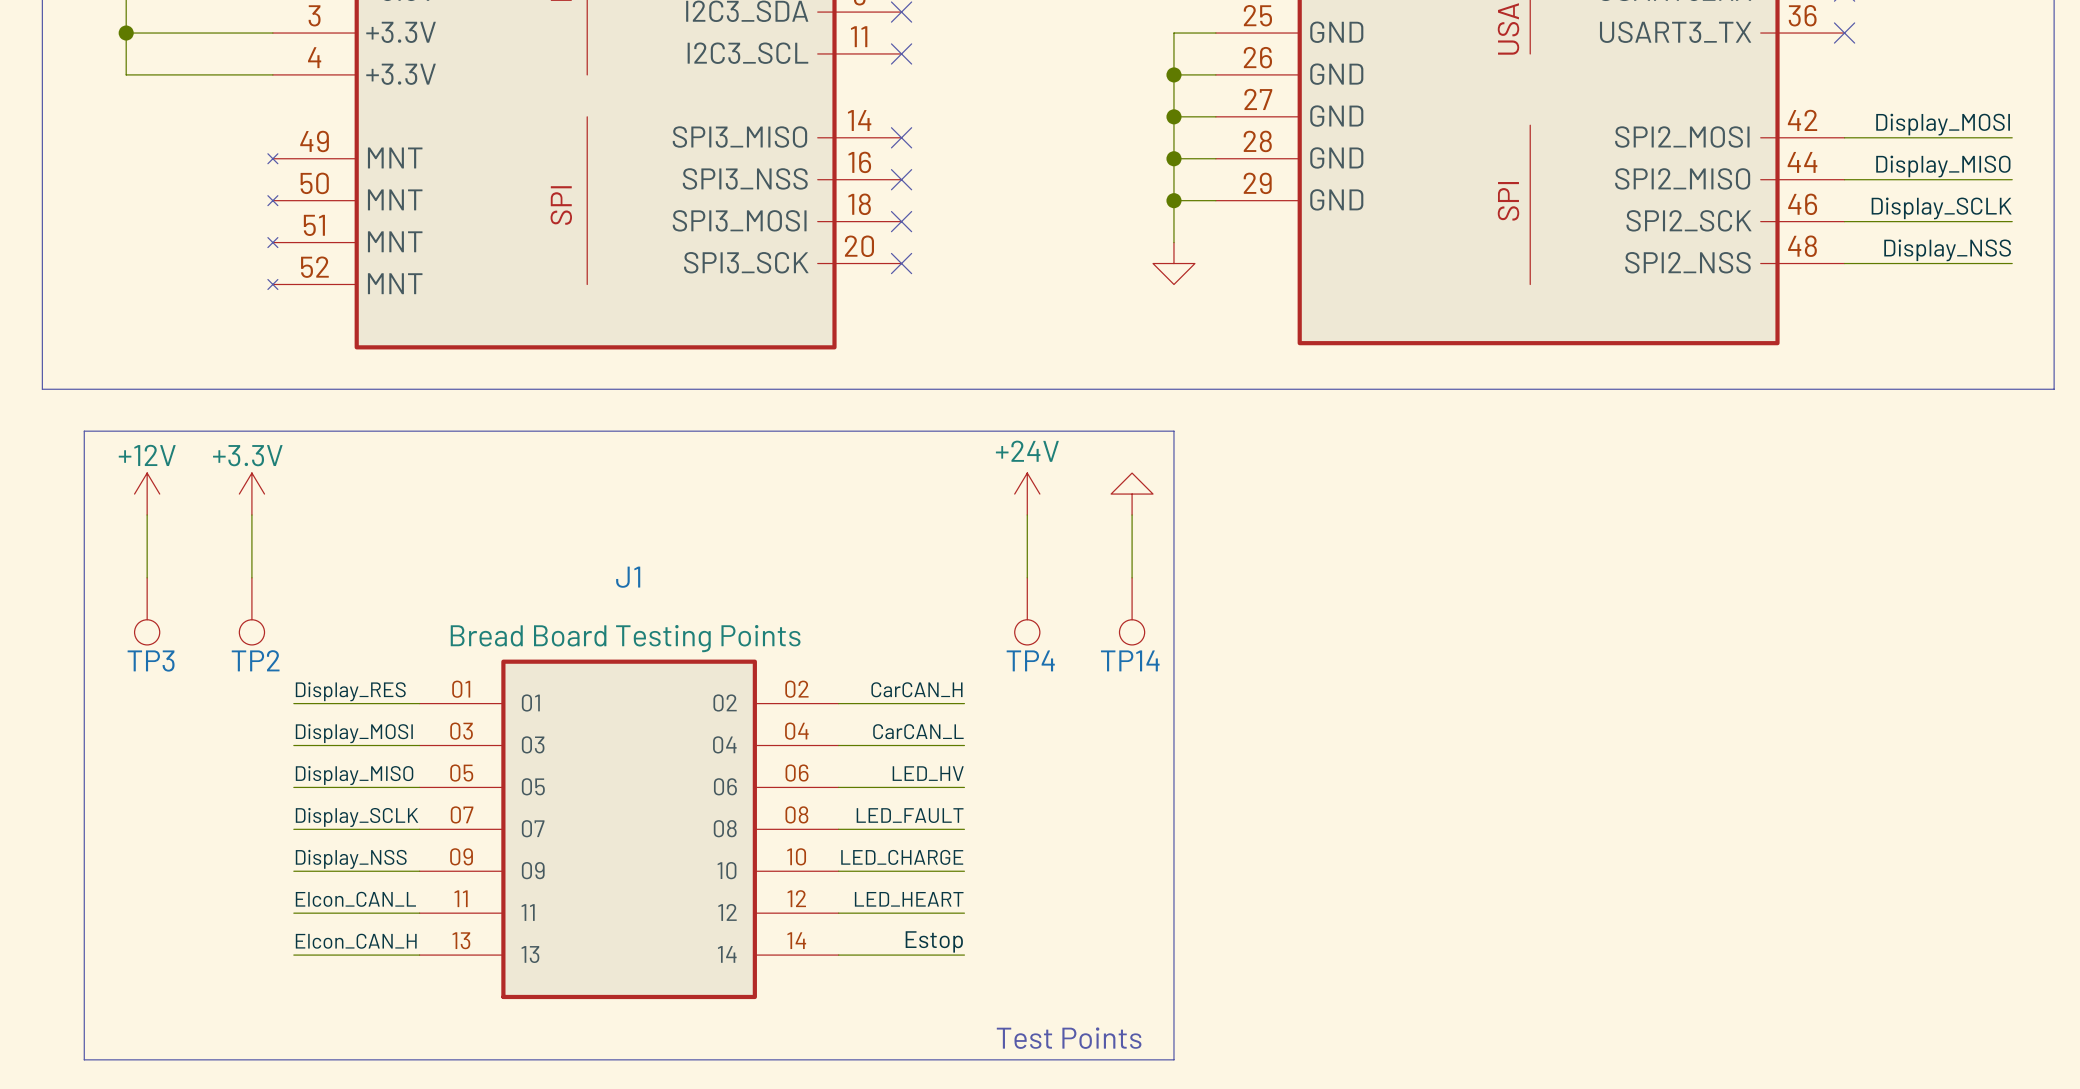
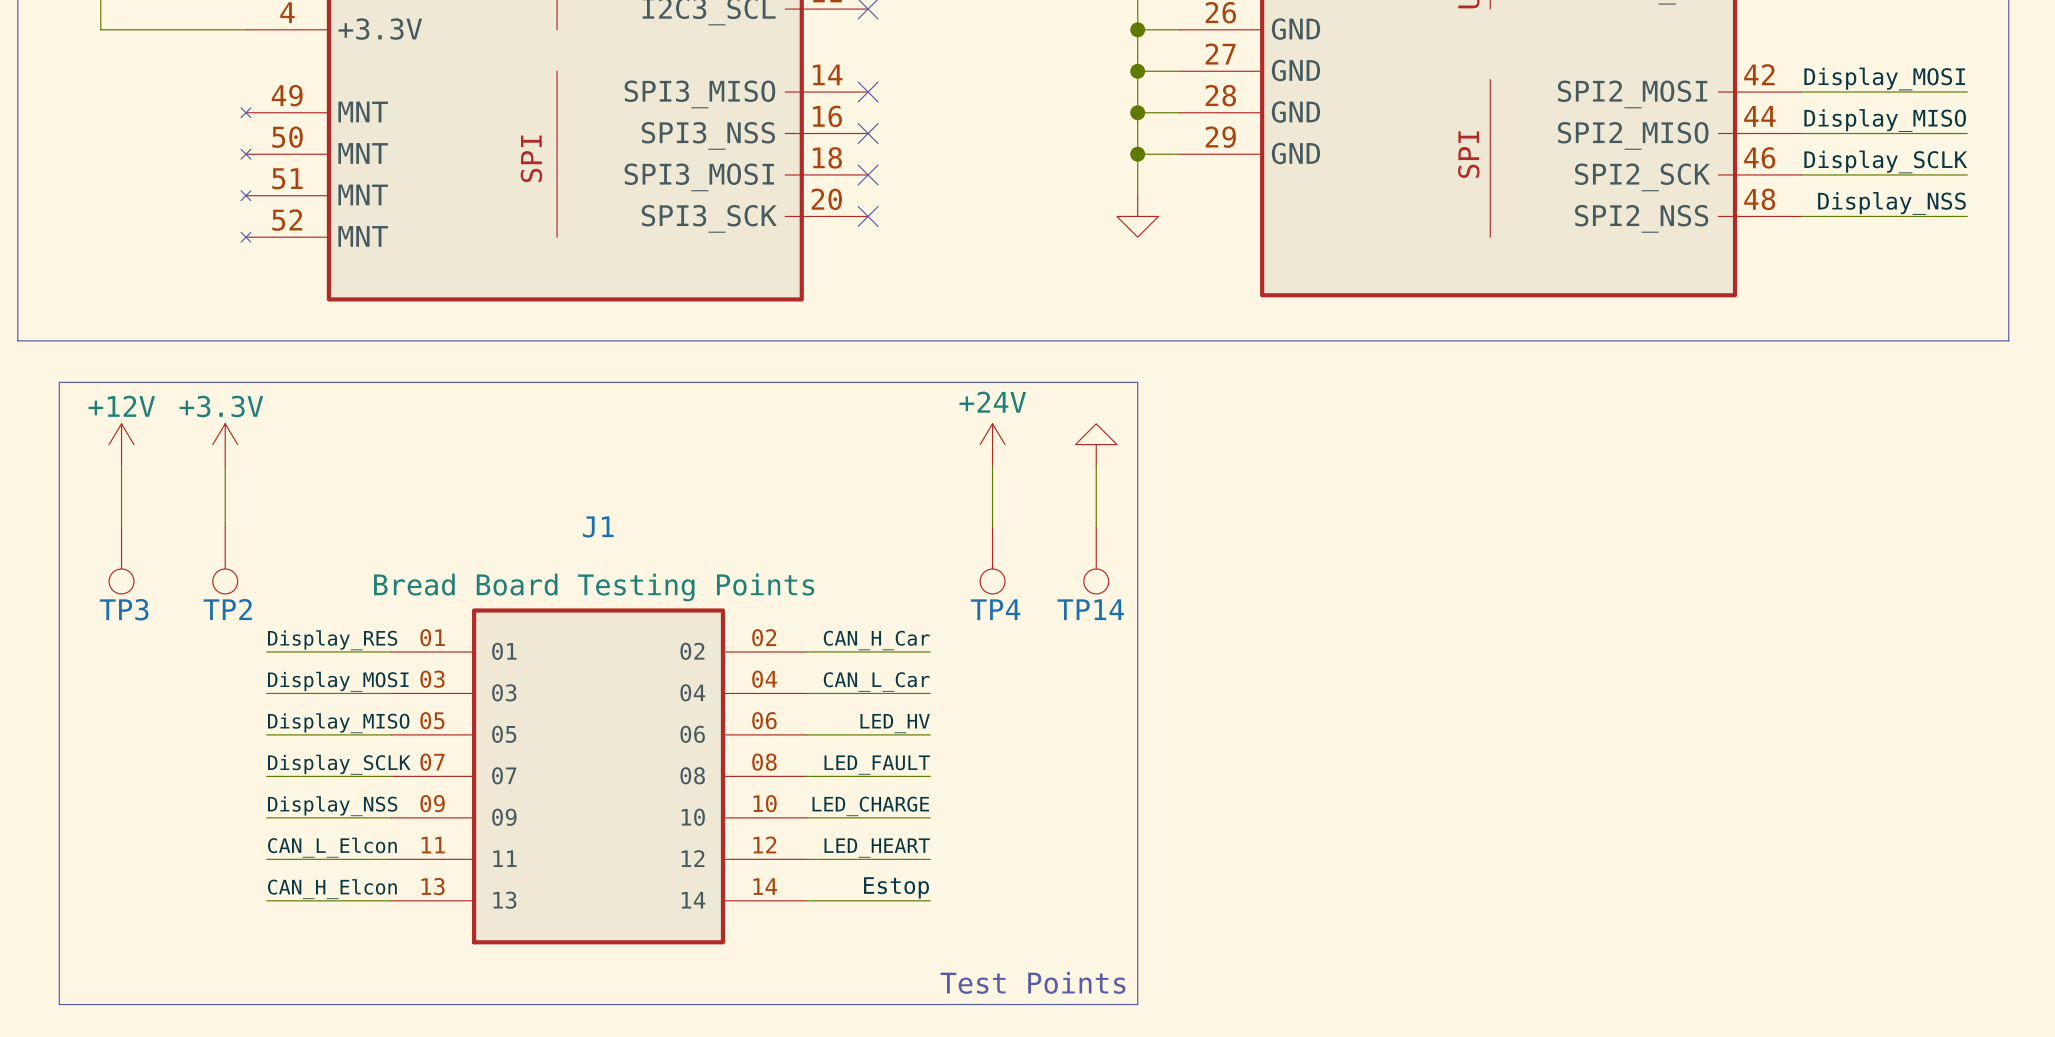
label: CarCAN_H (916, 689) -> CAN_H_Car (876, 640)
label: CarCAN_L (918, 731) -> CAN_L_Car (876, 681)
label: Elcon_CAN_L (355, 899) -> CAN_L_Elcon (332, 847)
label: Elcon_CAN_H (356, 941) -> CAN_H_Elcon (332, 889)

